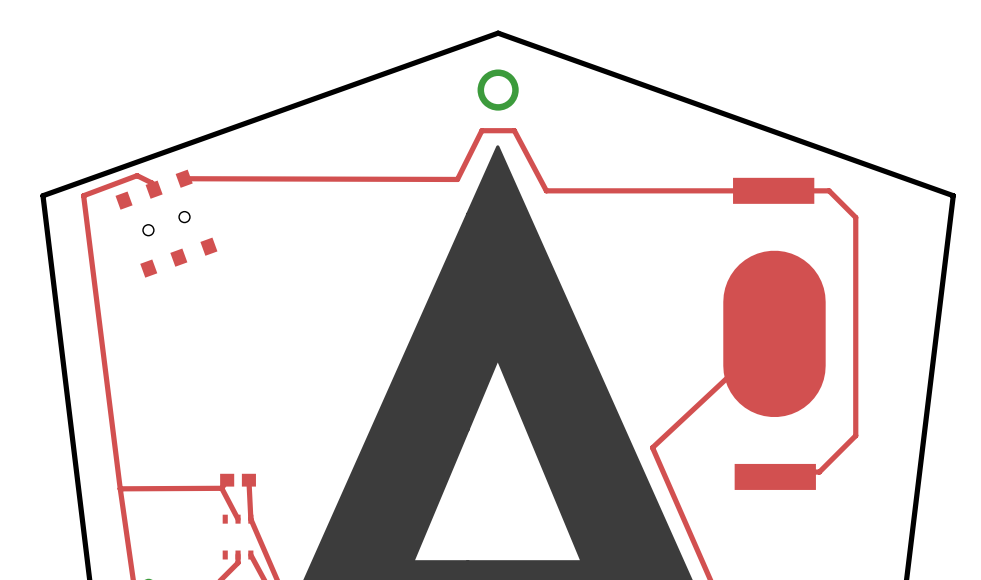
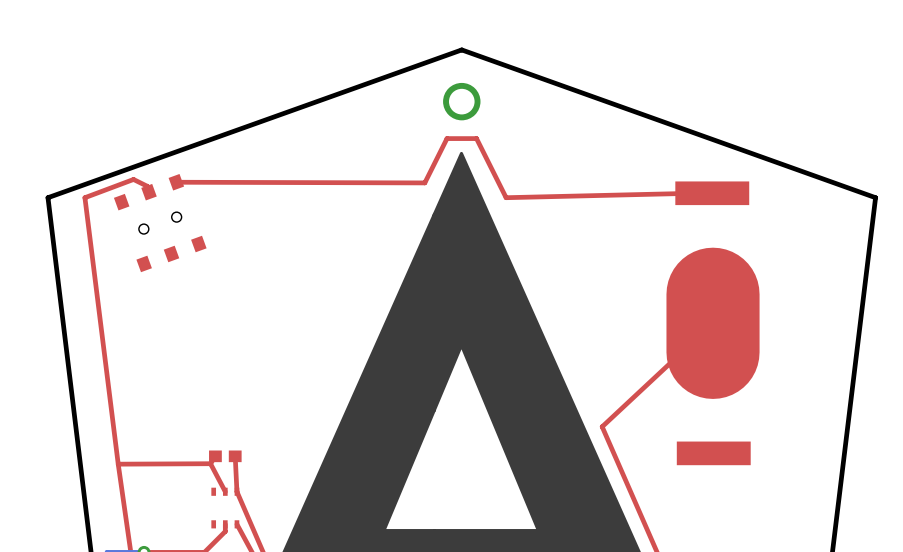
top track: (514, 130) (546, 190) (829, 190) (855, 217) (855, 435) (819, 472) (798, 472) (798, 480) (754, 480) (754, 476) -> (476, 138) (506, 197) (693, 193)

